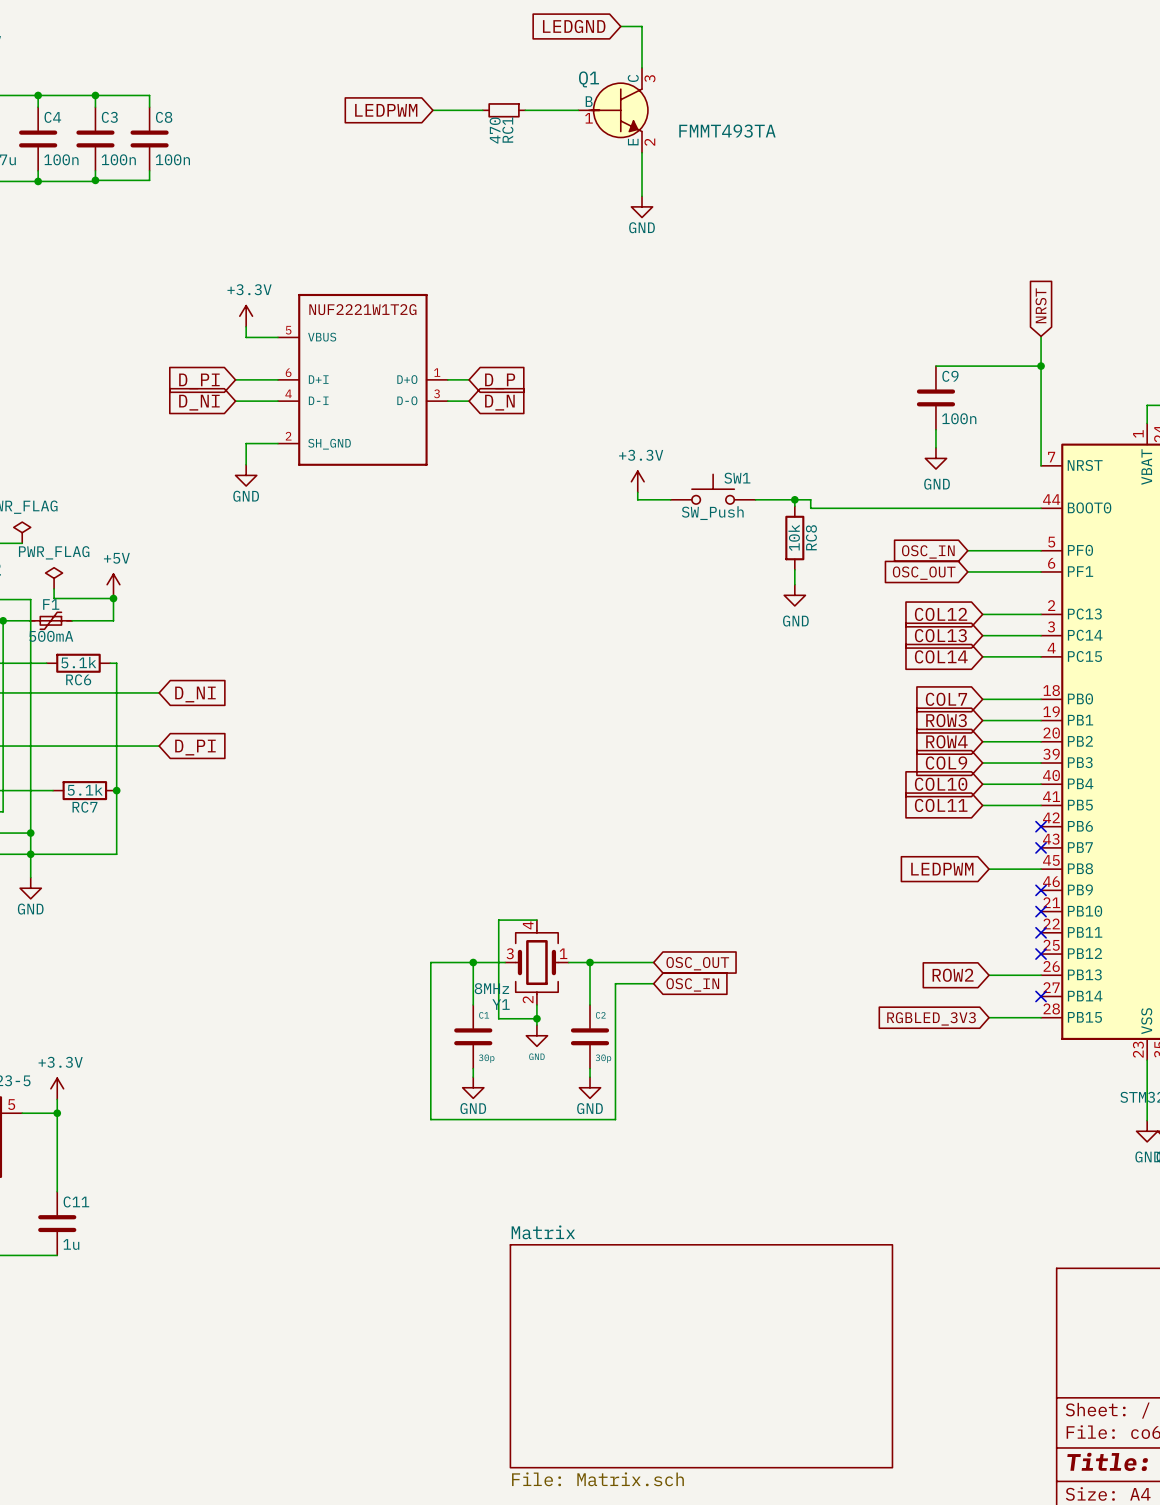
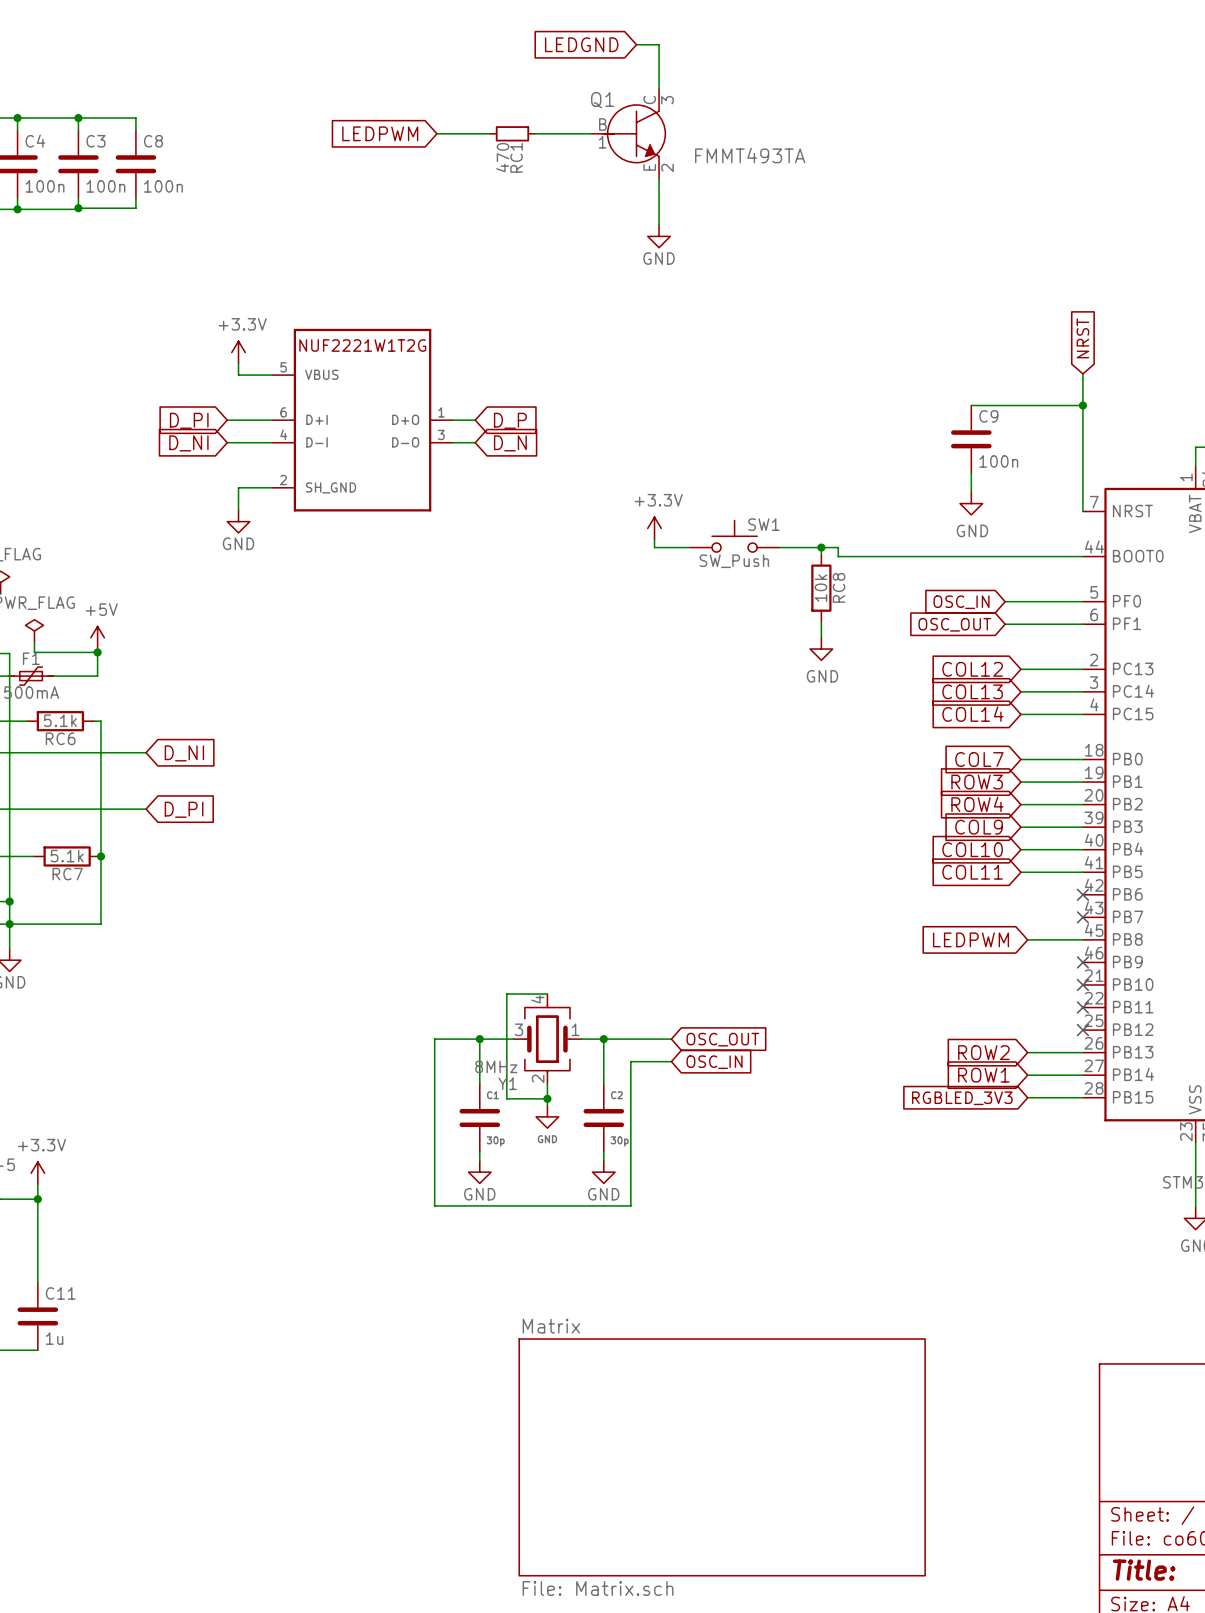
global label: none -> ROW1 (983, 1075)
wire: none -> (1027, 1075) (1082, 1075)
no-connect mark: (1041, 996) -> none

